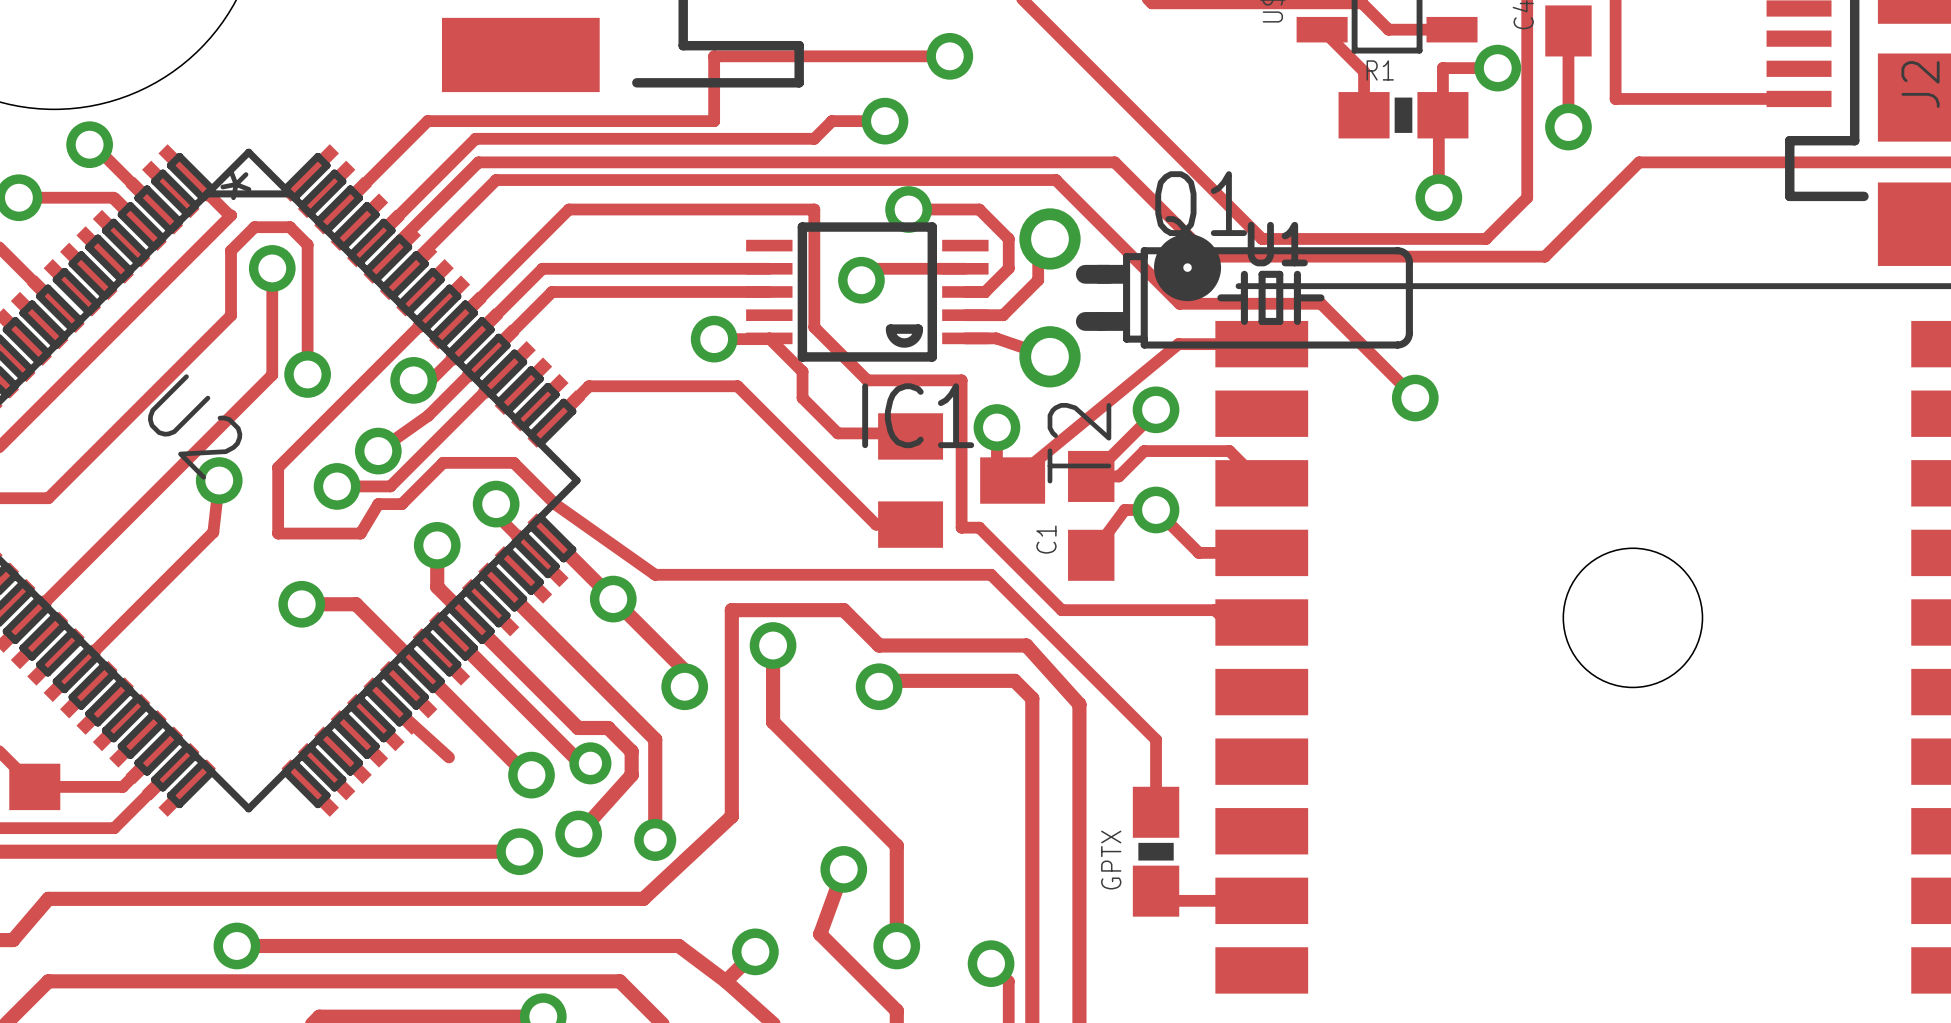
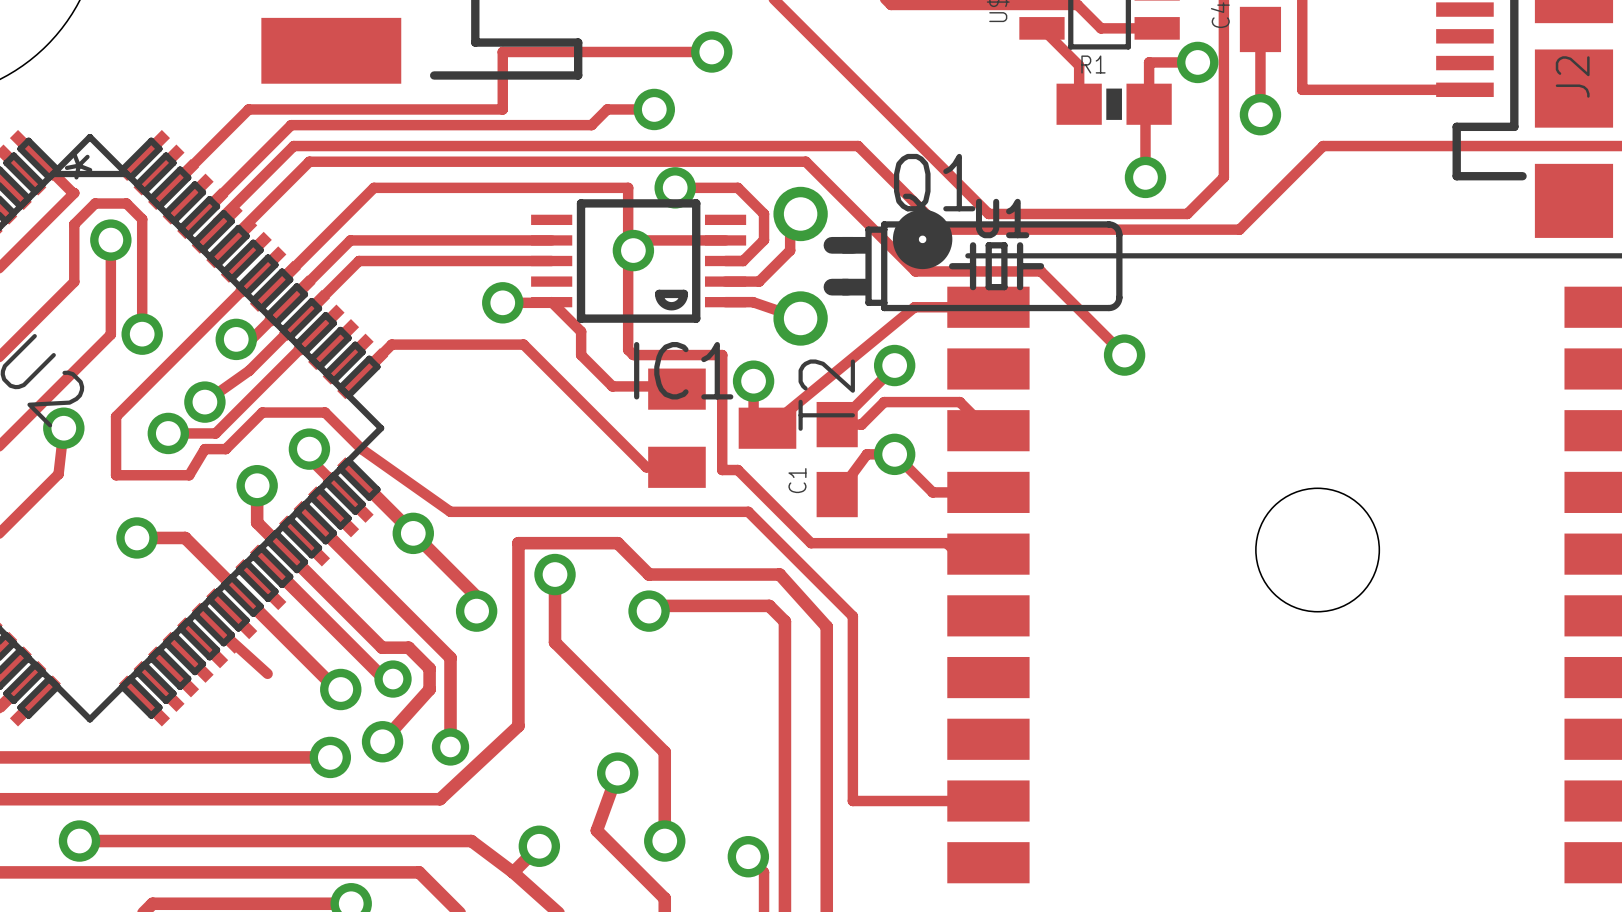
track: (814, 209) (814, 327) (867, 380) (961, 380) (961, 398) -> (591, 187) (628, 187) (628, 349) (633, 355) (722, 355)
track: (1108, 692) (1156, 739) (1156, 812) -> (852, 616) (852, 801) (894, 801)
GPTX: (1156, 851) -> none

